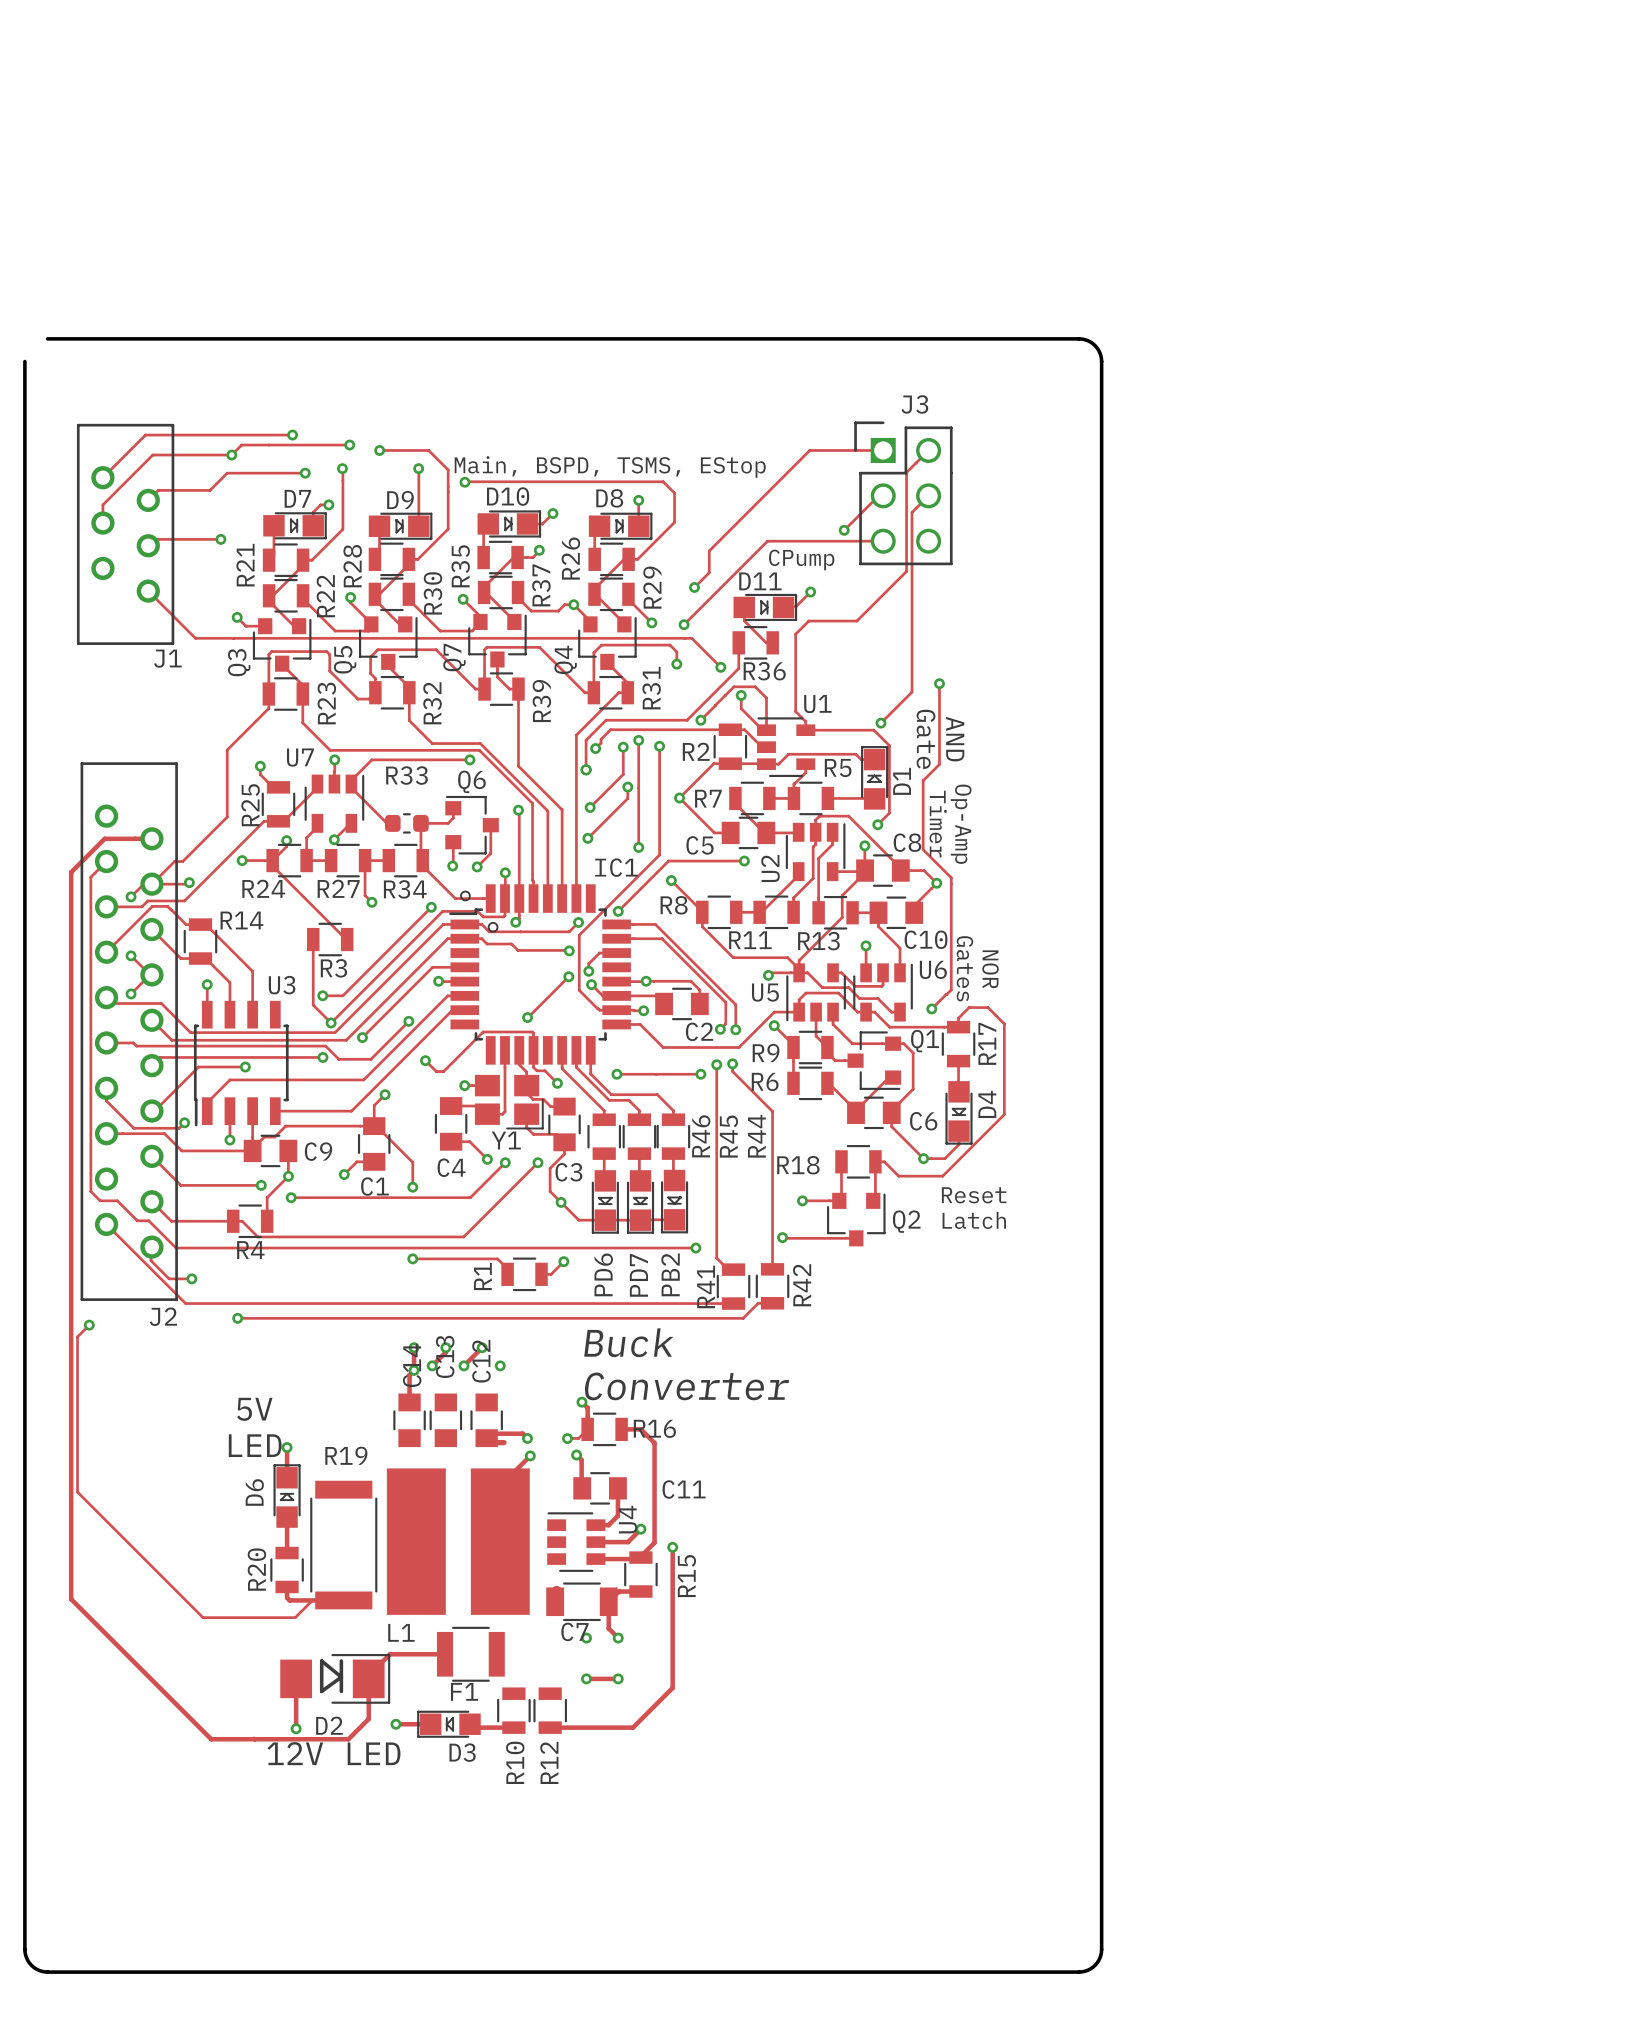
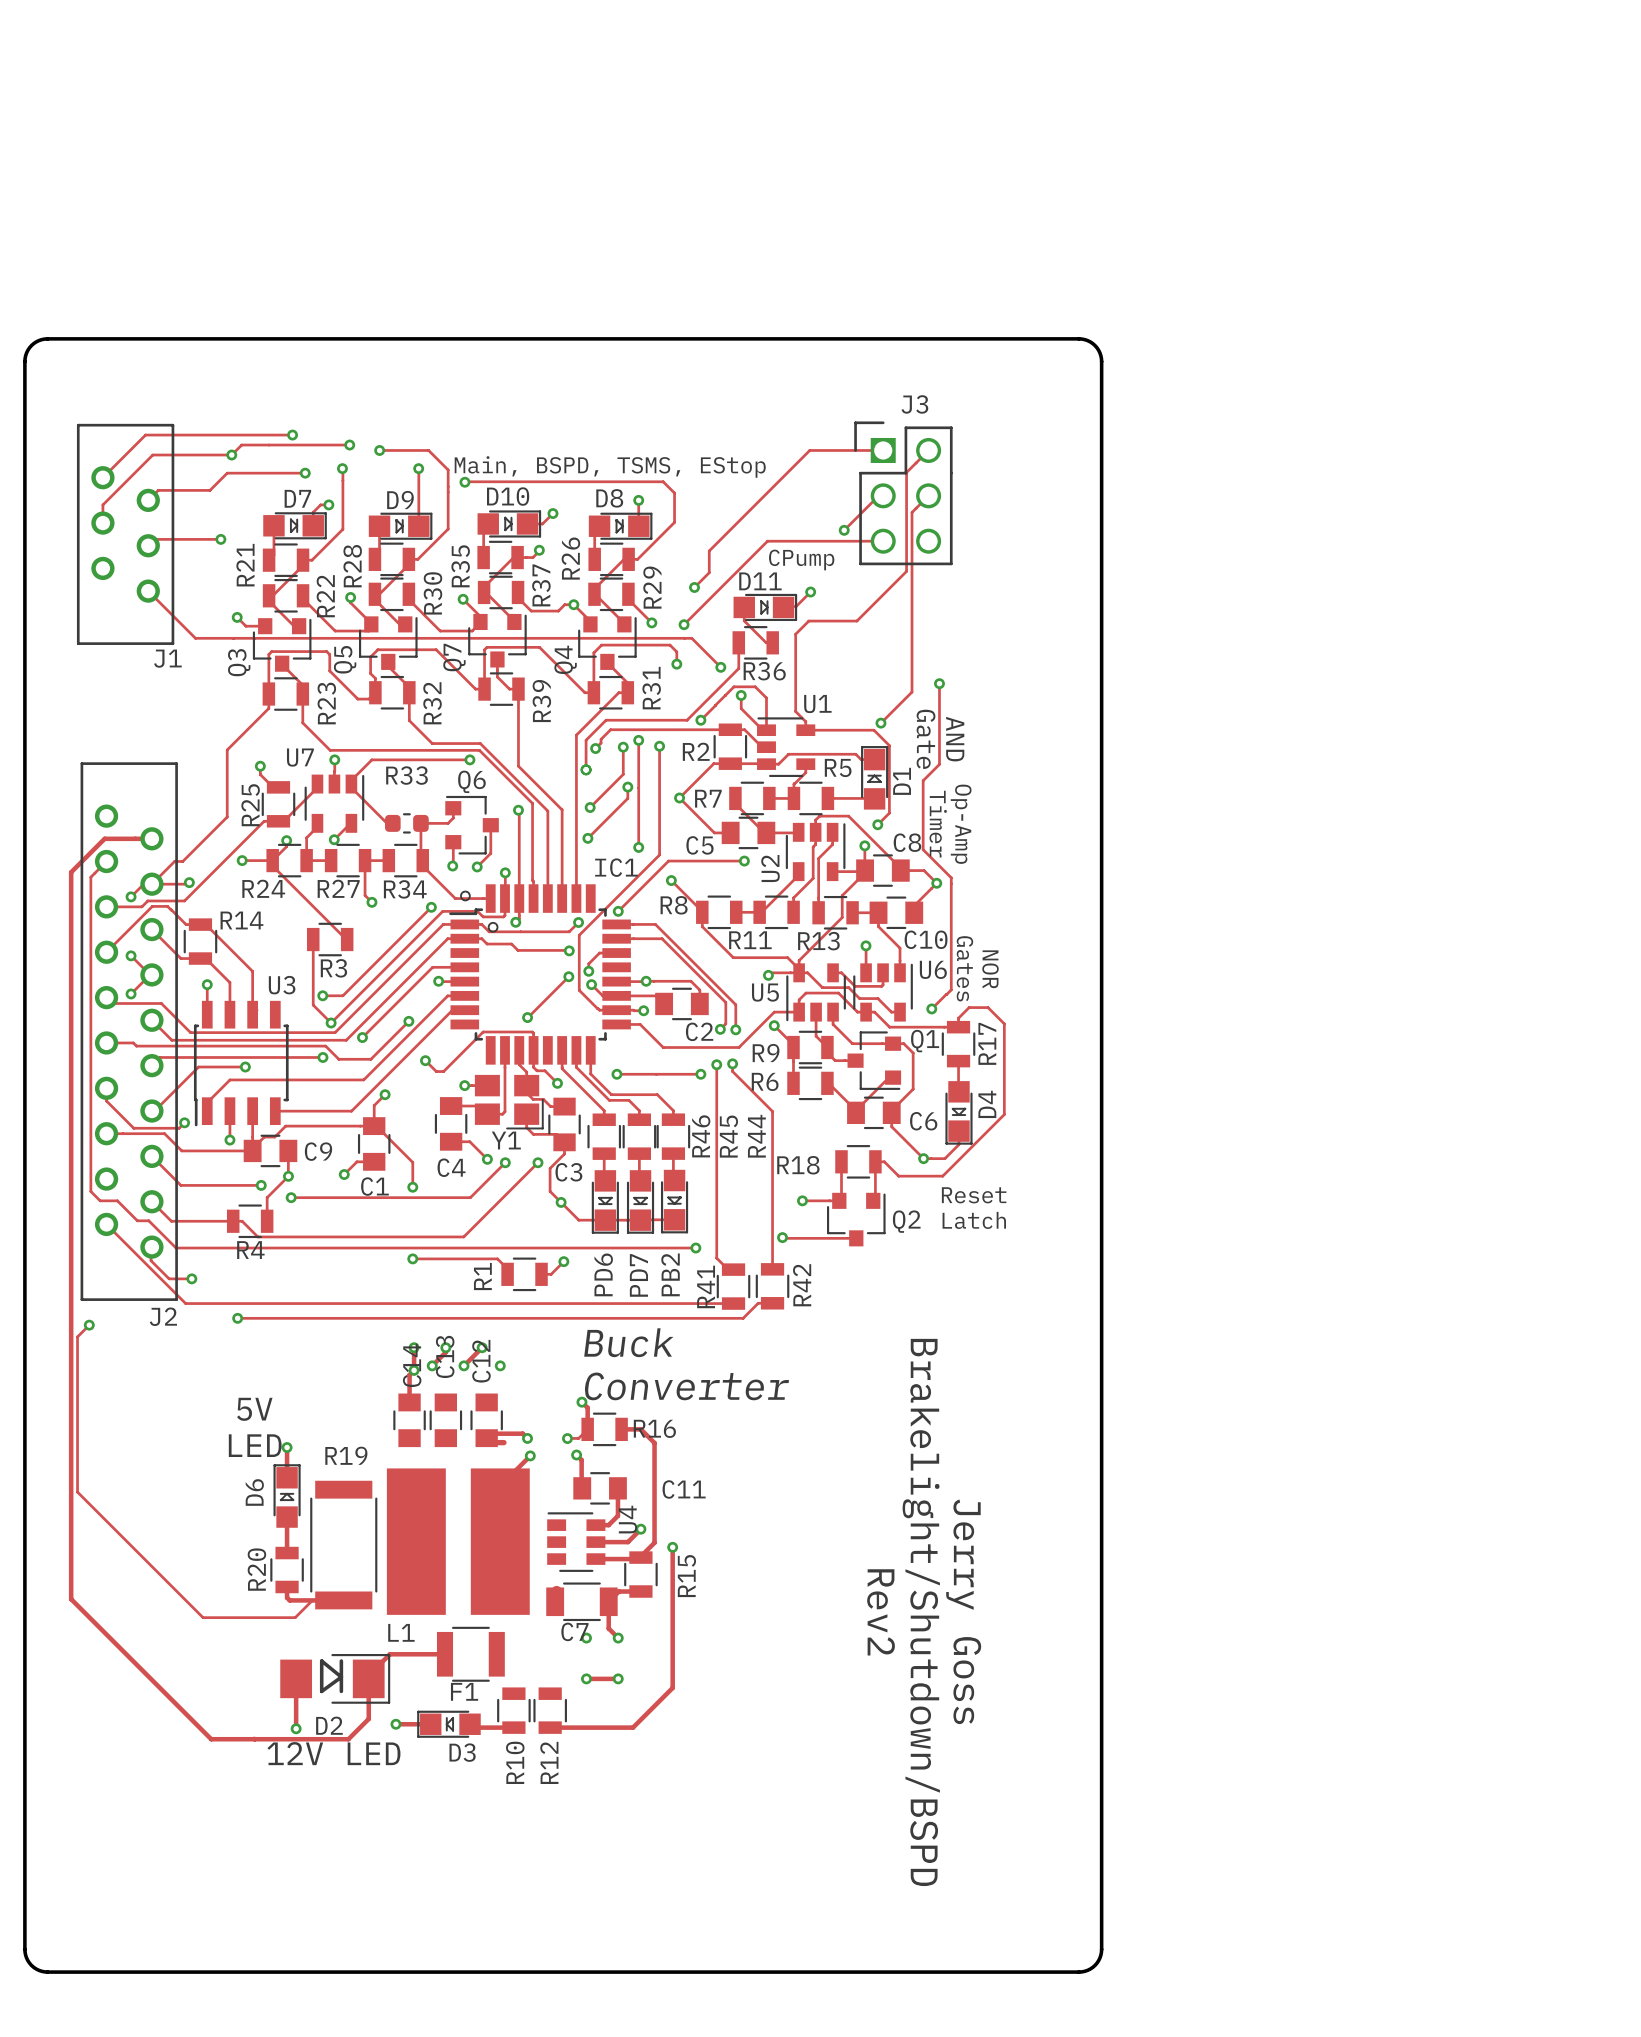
board edge: none -> (47, 338) (38, 340) (31, 345) (26, 352) (24, 361)
text: none -> Jerry Goss (963, 1611)
text: none -> Rev2 (881, 1612)
text: none -> Brakelight/Shutdown/BSPD (921, 1612)

